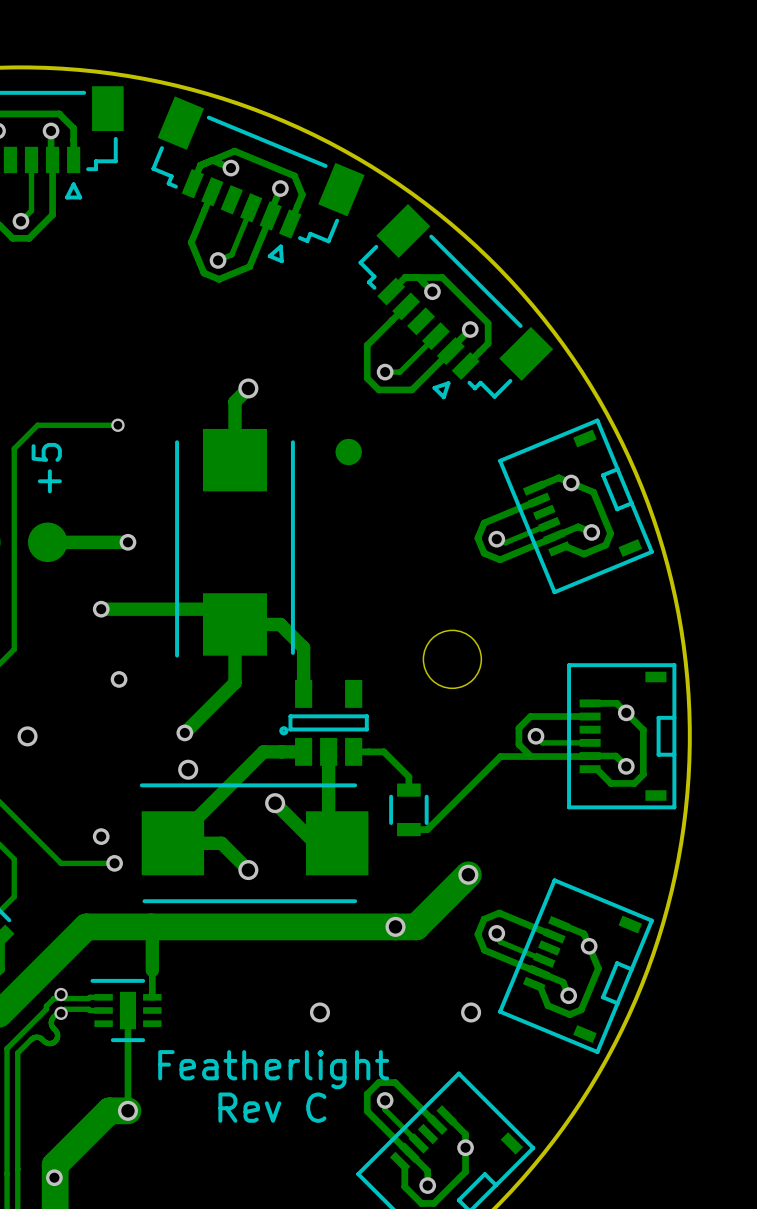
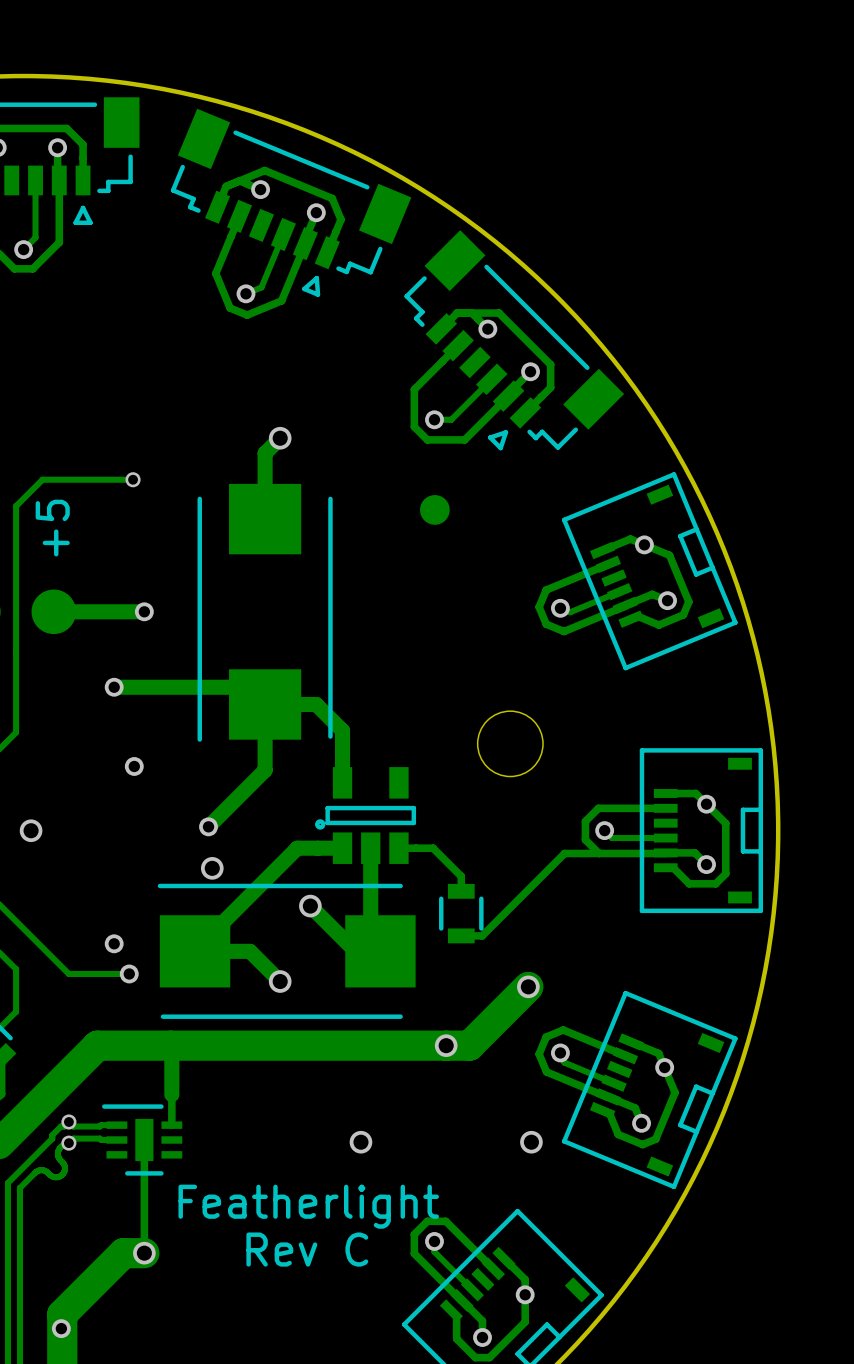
part position: (348, 452) -> (434, 509)

